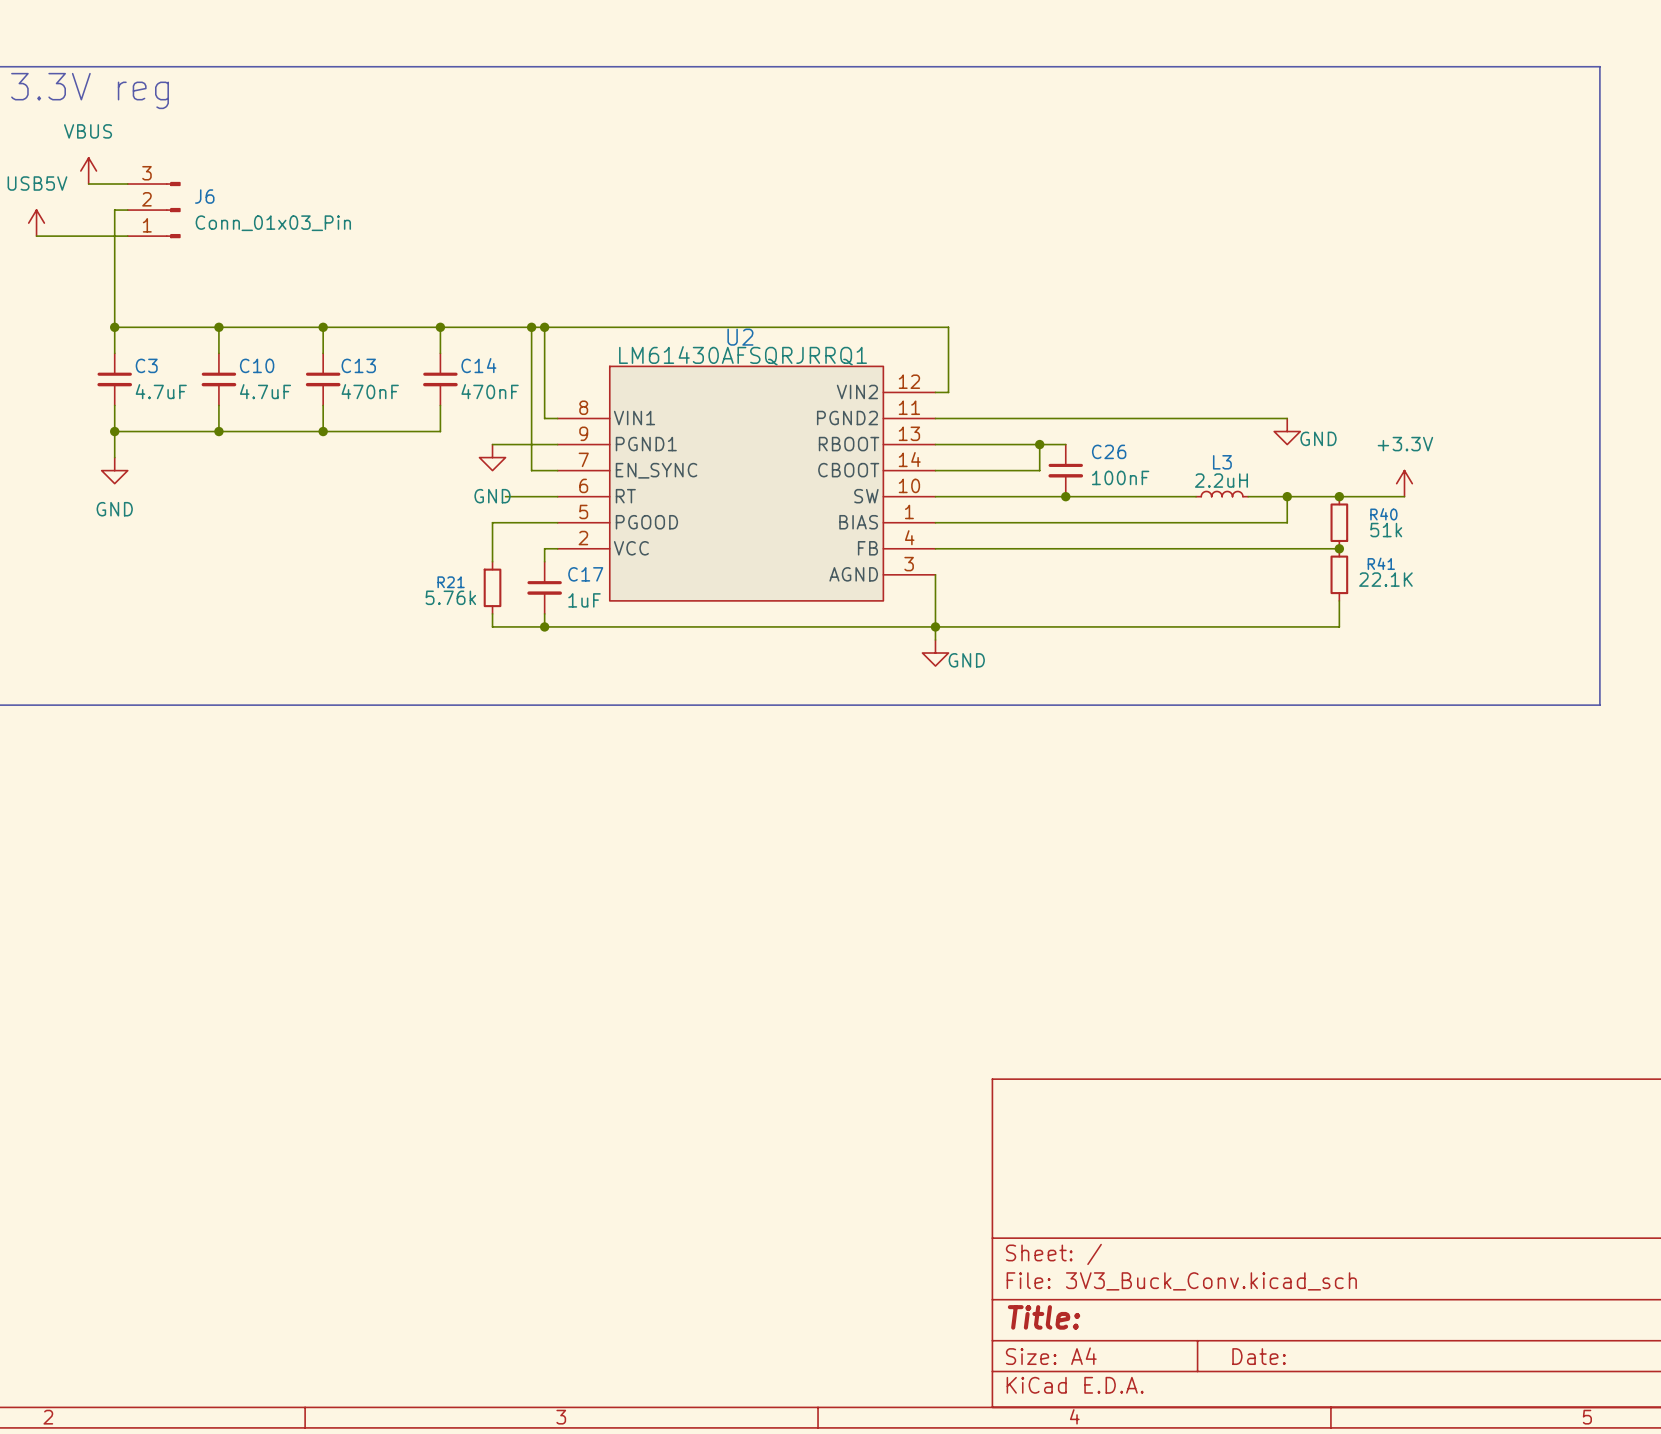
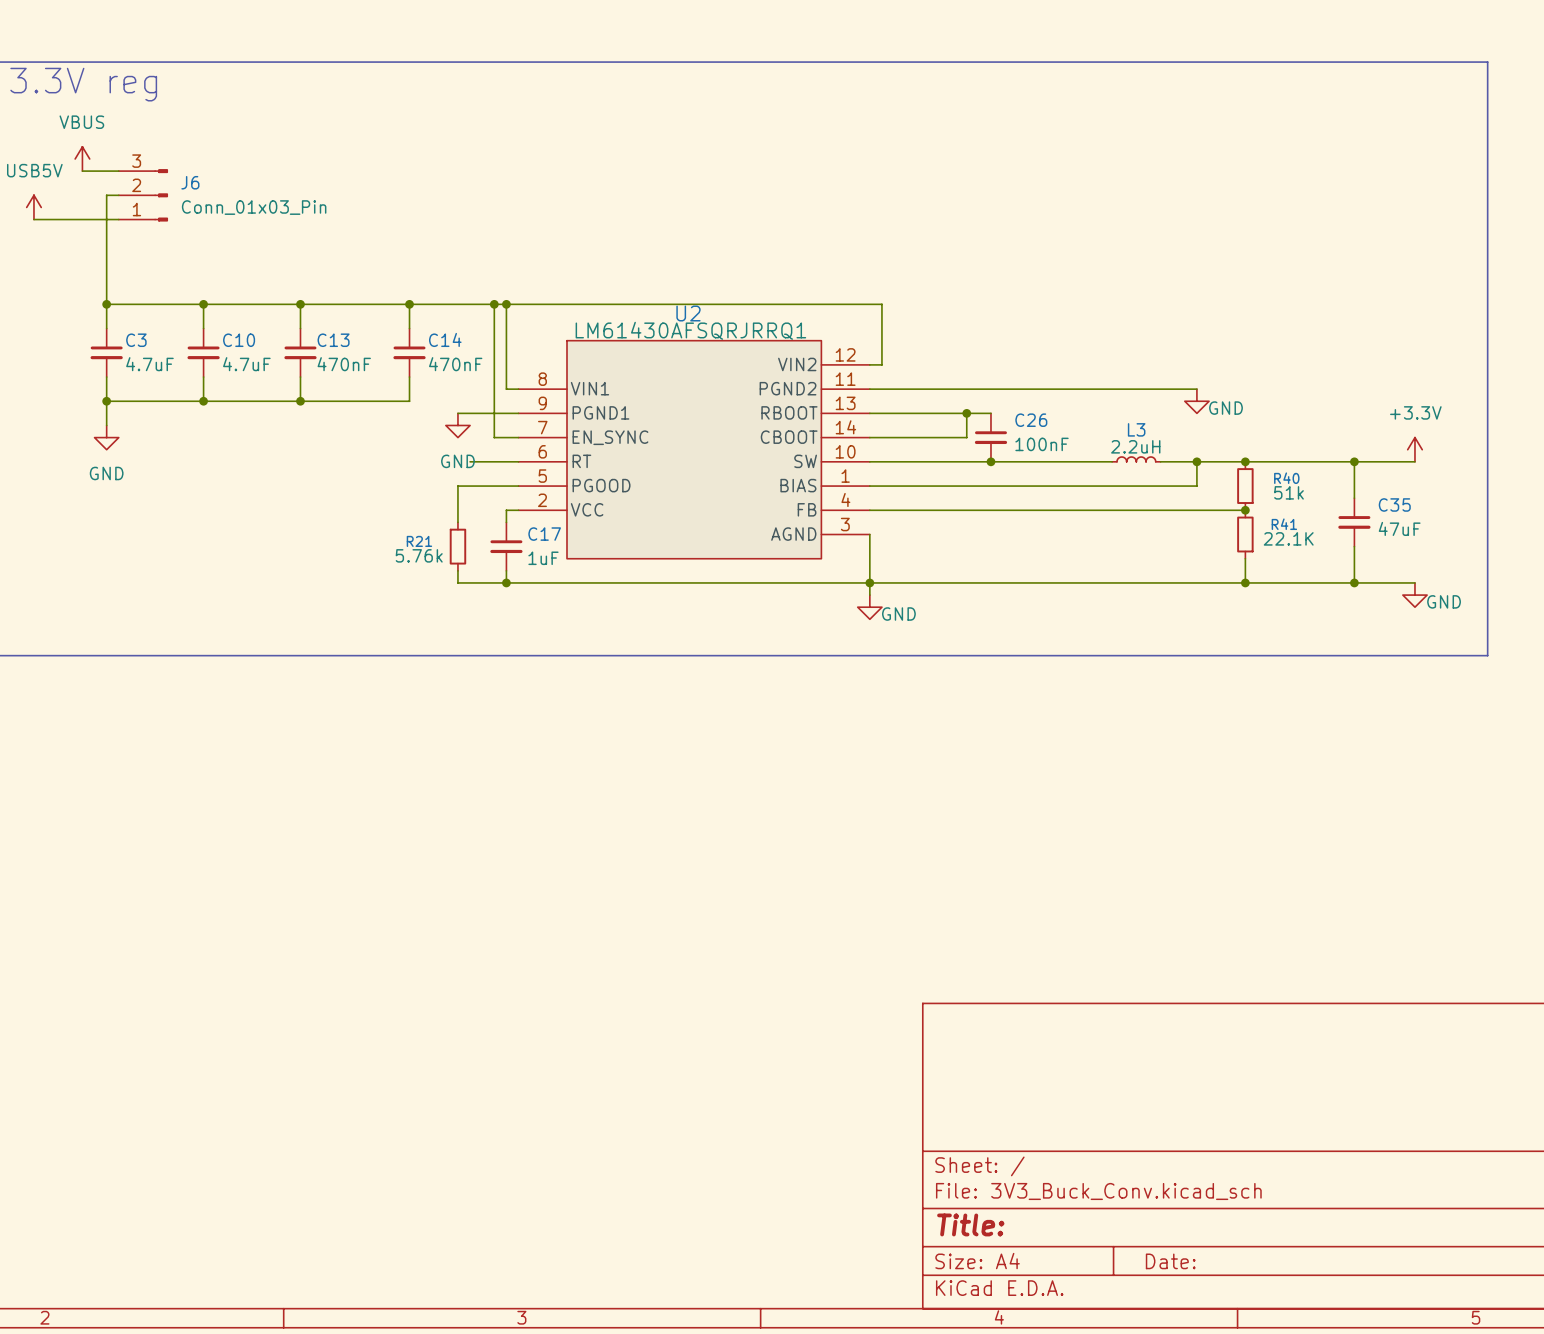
power symbol position: +3.3V (1404, 483) -> +3.3V (1414, 449)
wire: none -> (1305, 461) (1414, 461)
wire: none -> (1354, 461) (1354, 498)
junction: none -> (1354, 461)
C35: none -> 47uF (1354, 522)
wire: none -> (1354, 546) (1354, 582)
wire: none -> (1245, 582) (1414, 582)
junction: none -> (1245, 582)
junction: none -> (1354, 582)
power symbol: none -> GND (1414, 595)

